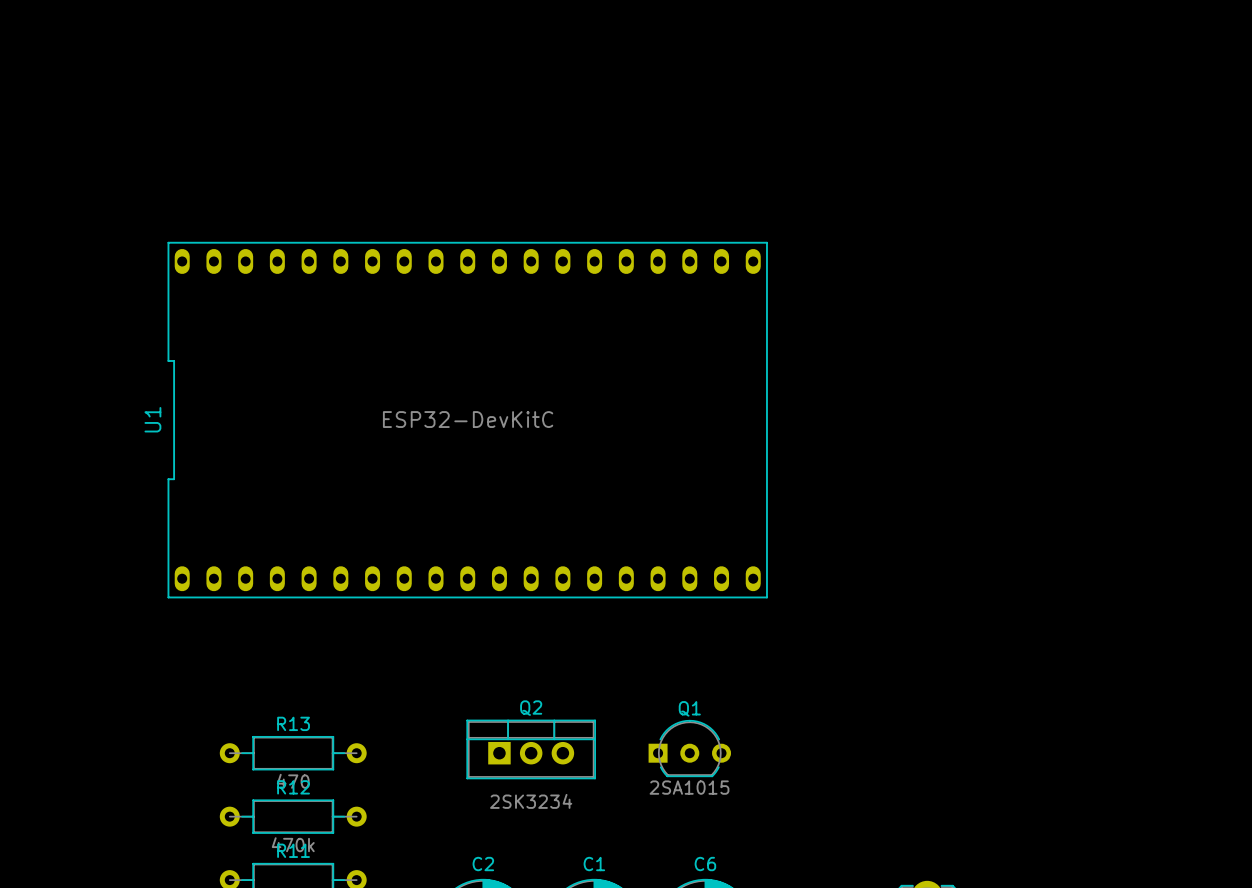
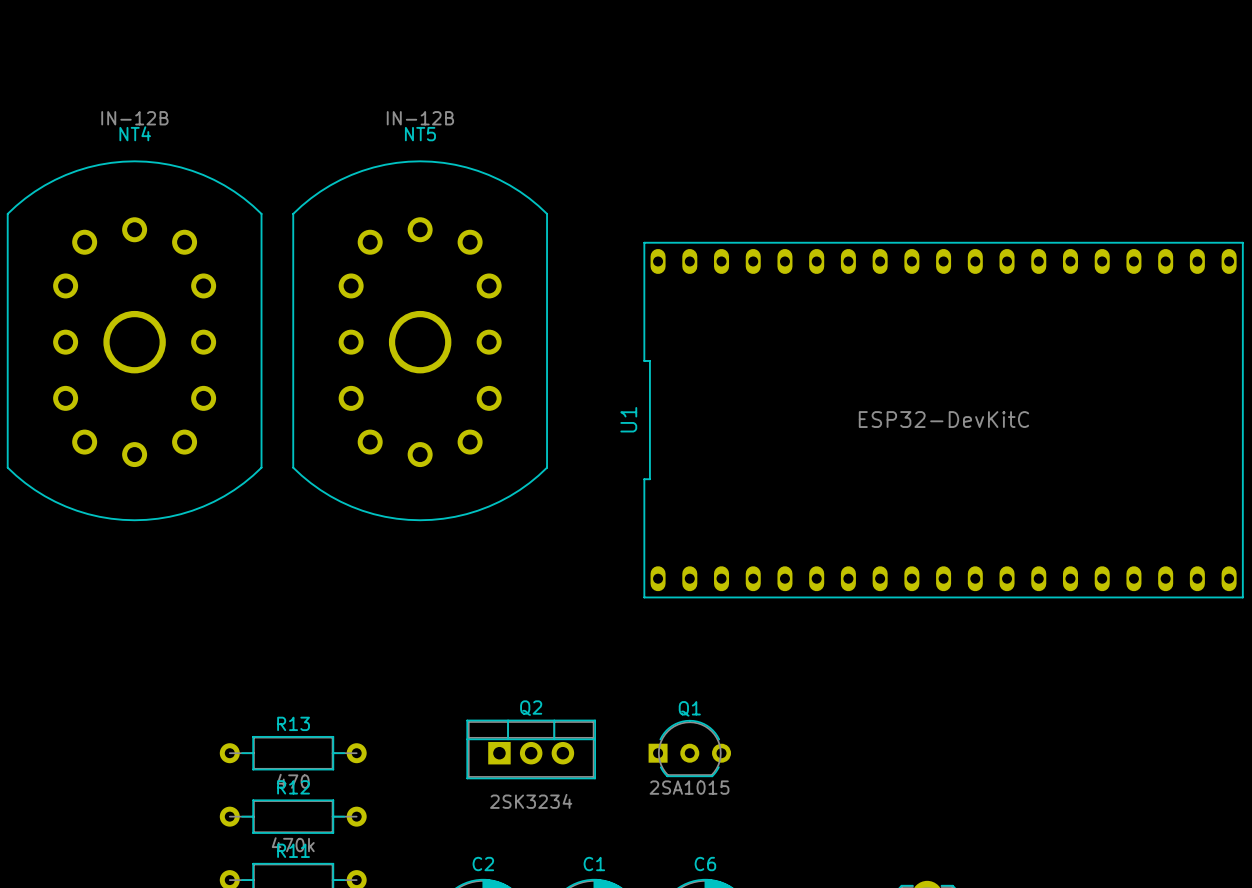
NT4: none -> IN-12B (134, 340)
NT5: none -> IN-12B (420, 340)
U1 position: (467, 420) -> (943, 420)

